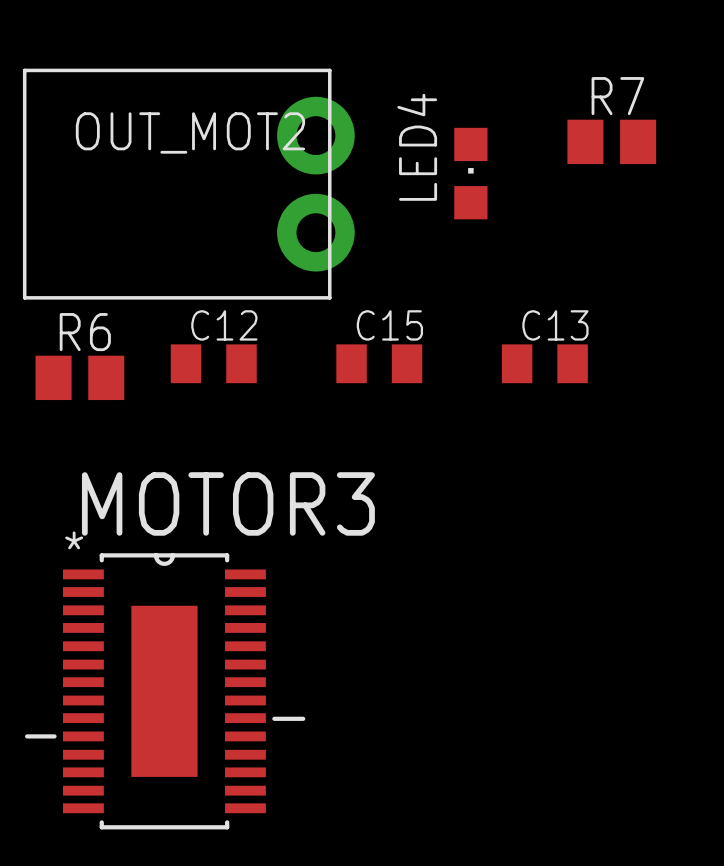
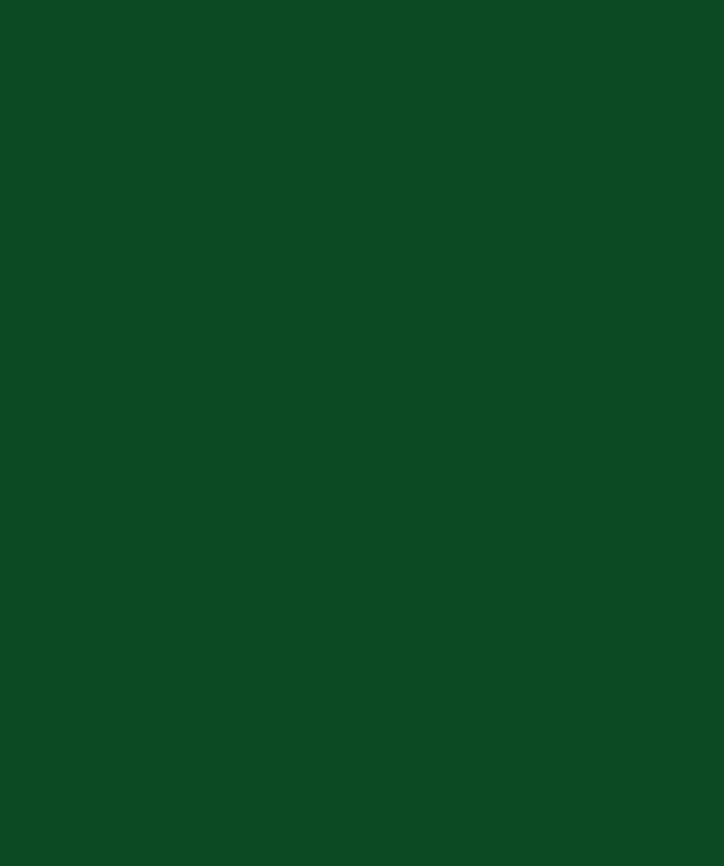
R7: (611, 141) -> none
LED4: (470, 173) -> none
OUT_MOT2: (188, 184) -> none
C12: (213, 363) -> none
C15: (379, 363) -> none
C13: (544, 363) -> none
R6: (79, 377) -> none
MOTOR3: (165, 691) -> none

